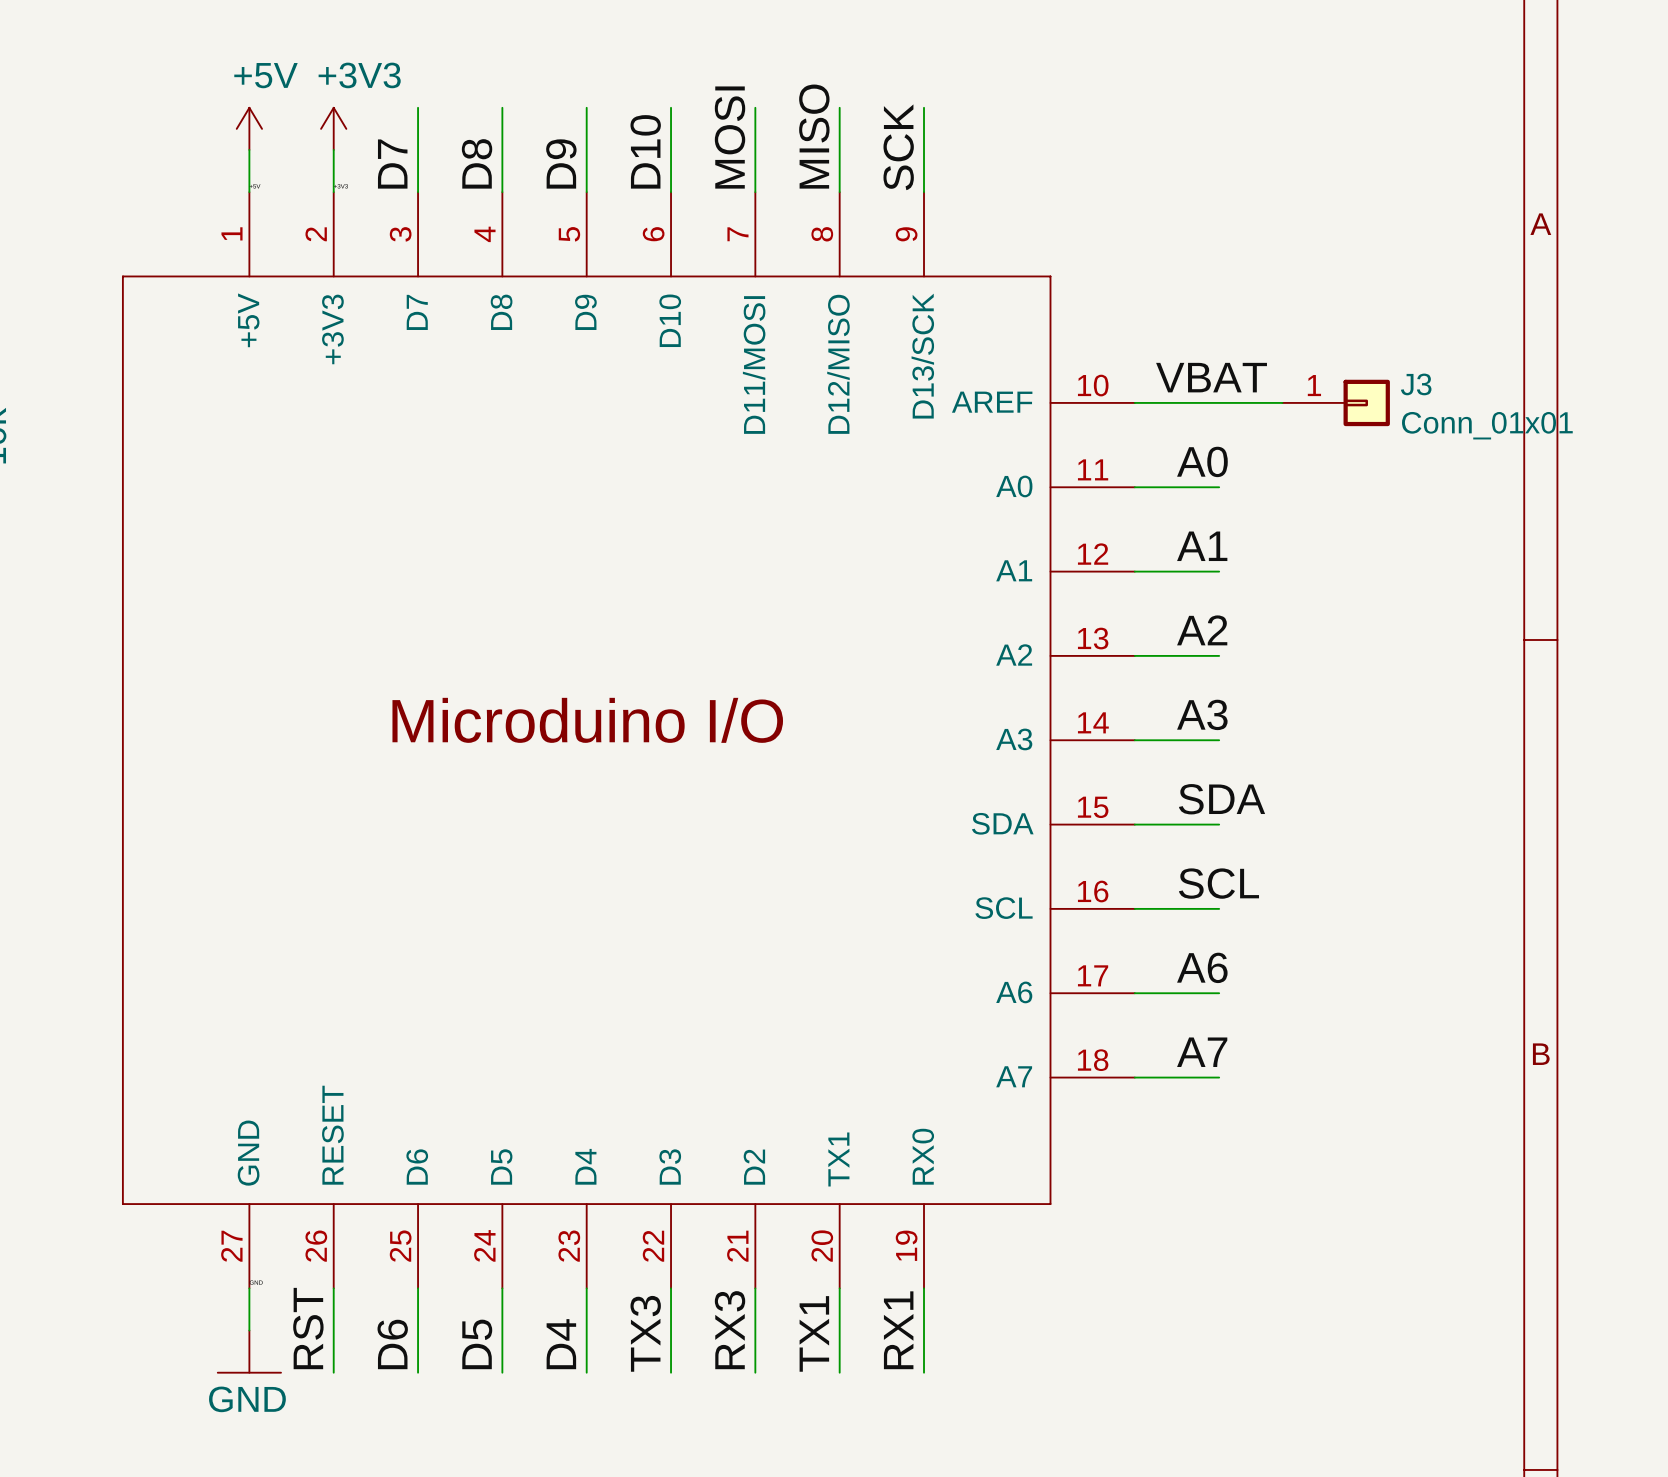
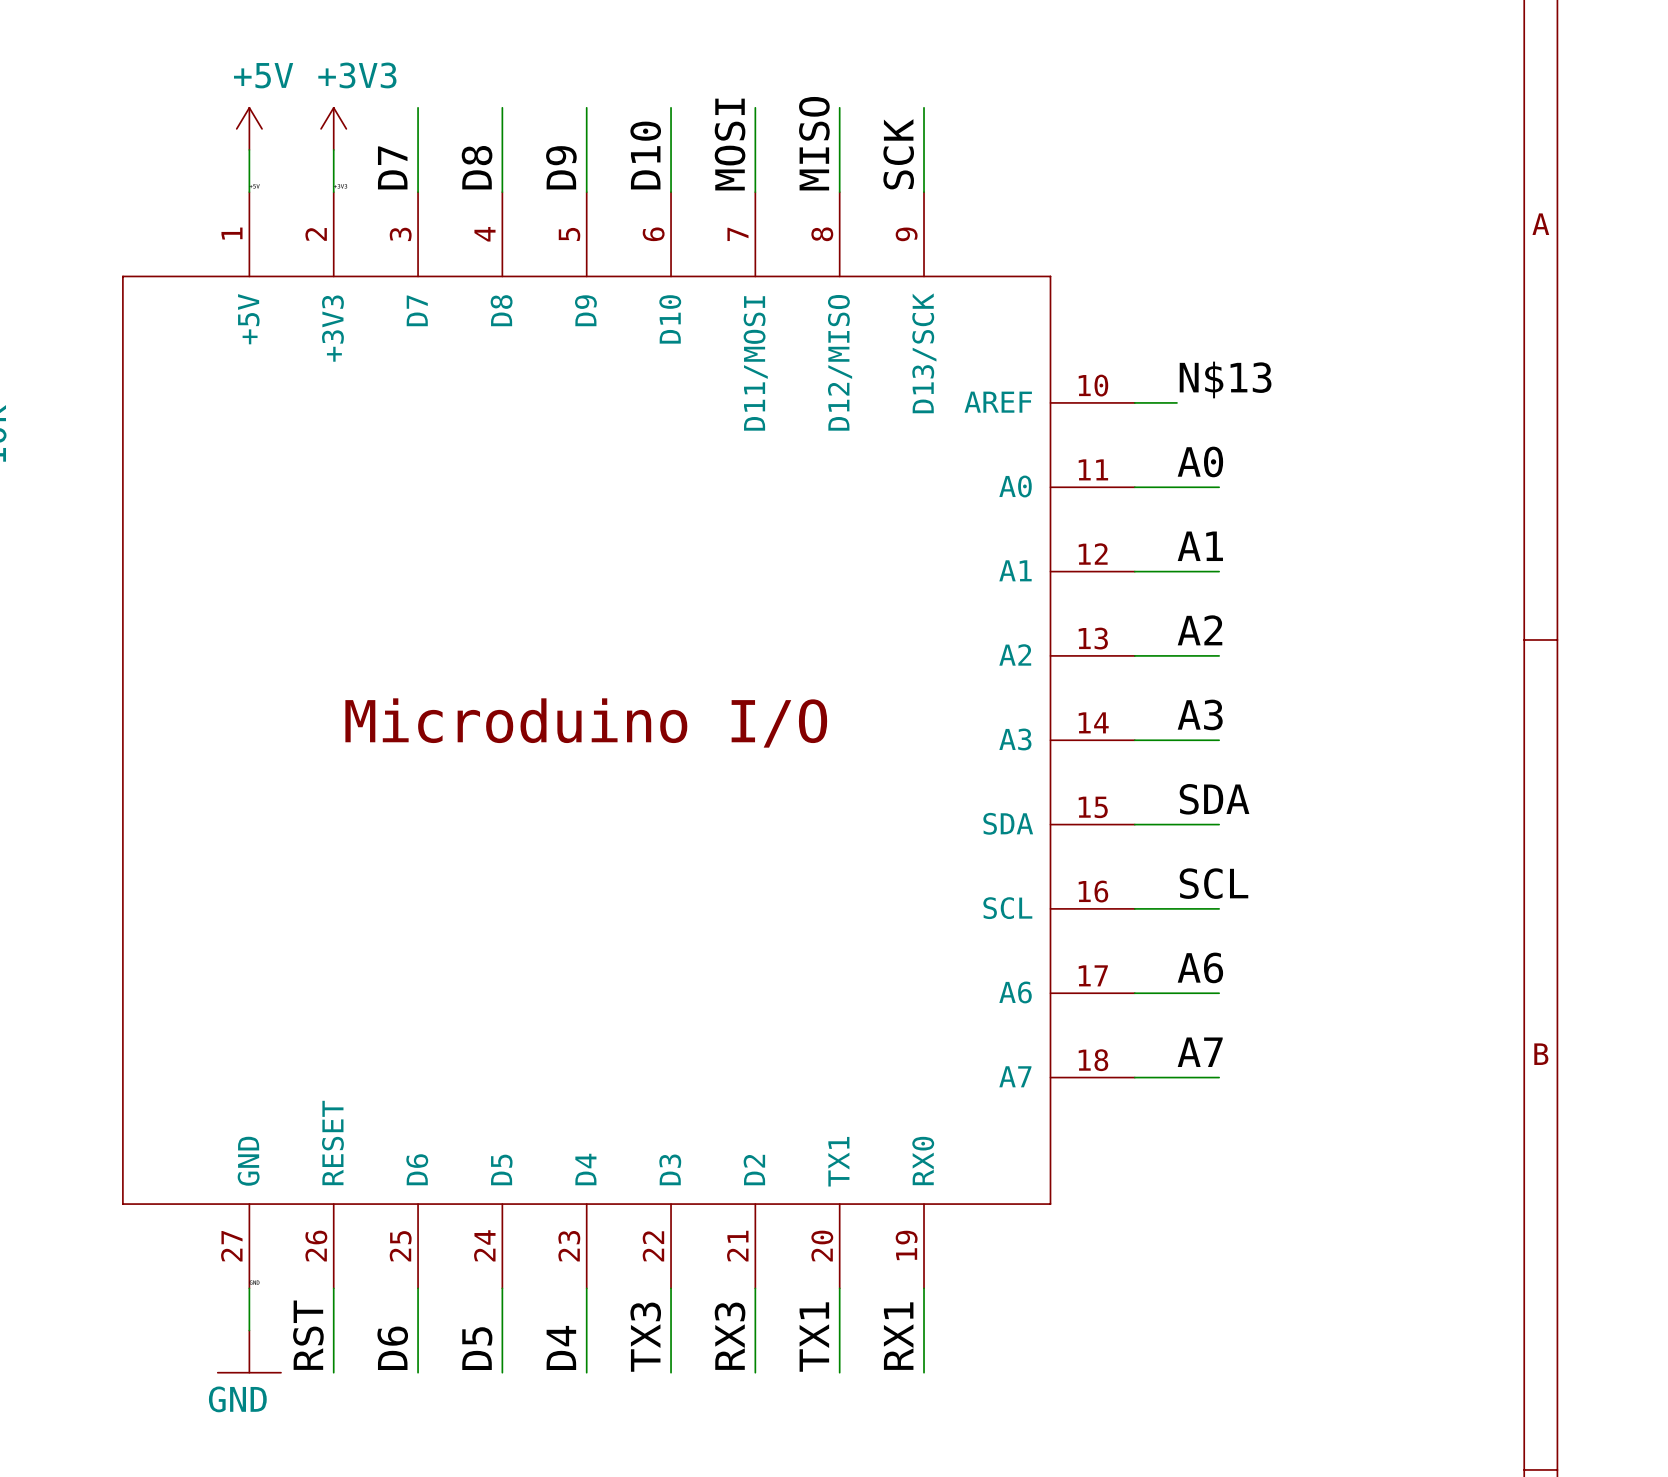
label: VBAT (1211, 377) -> none
label: none -> N$13 (1225, 379)
wire: (1176, 402) (1282, 402) -> none
J3: Conn_01x01 (1336, 402) -> none

